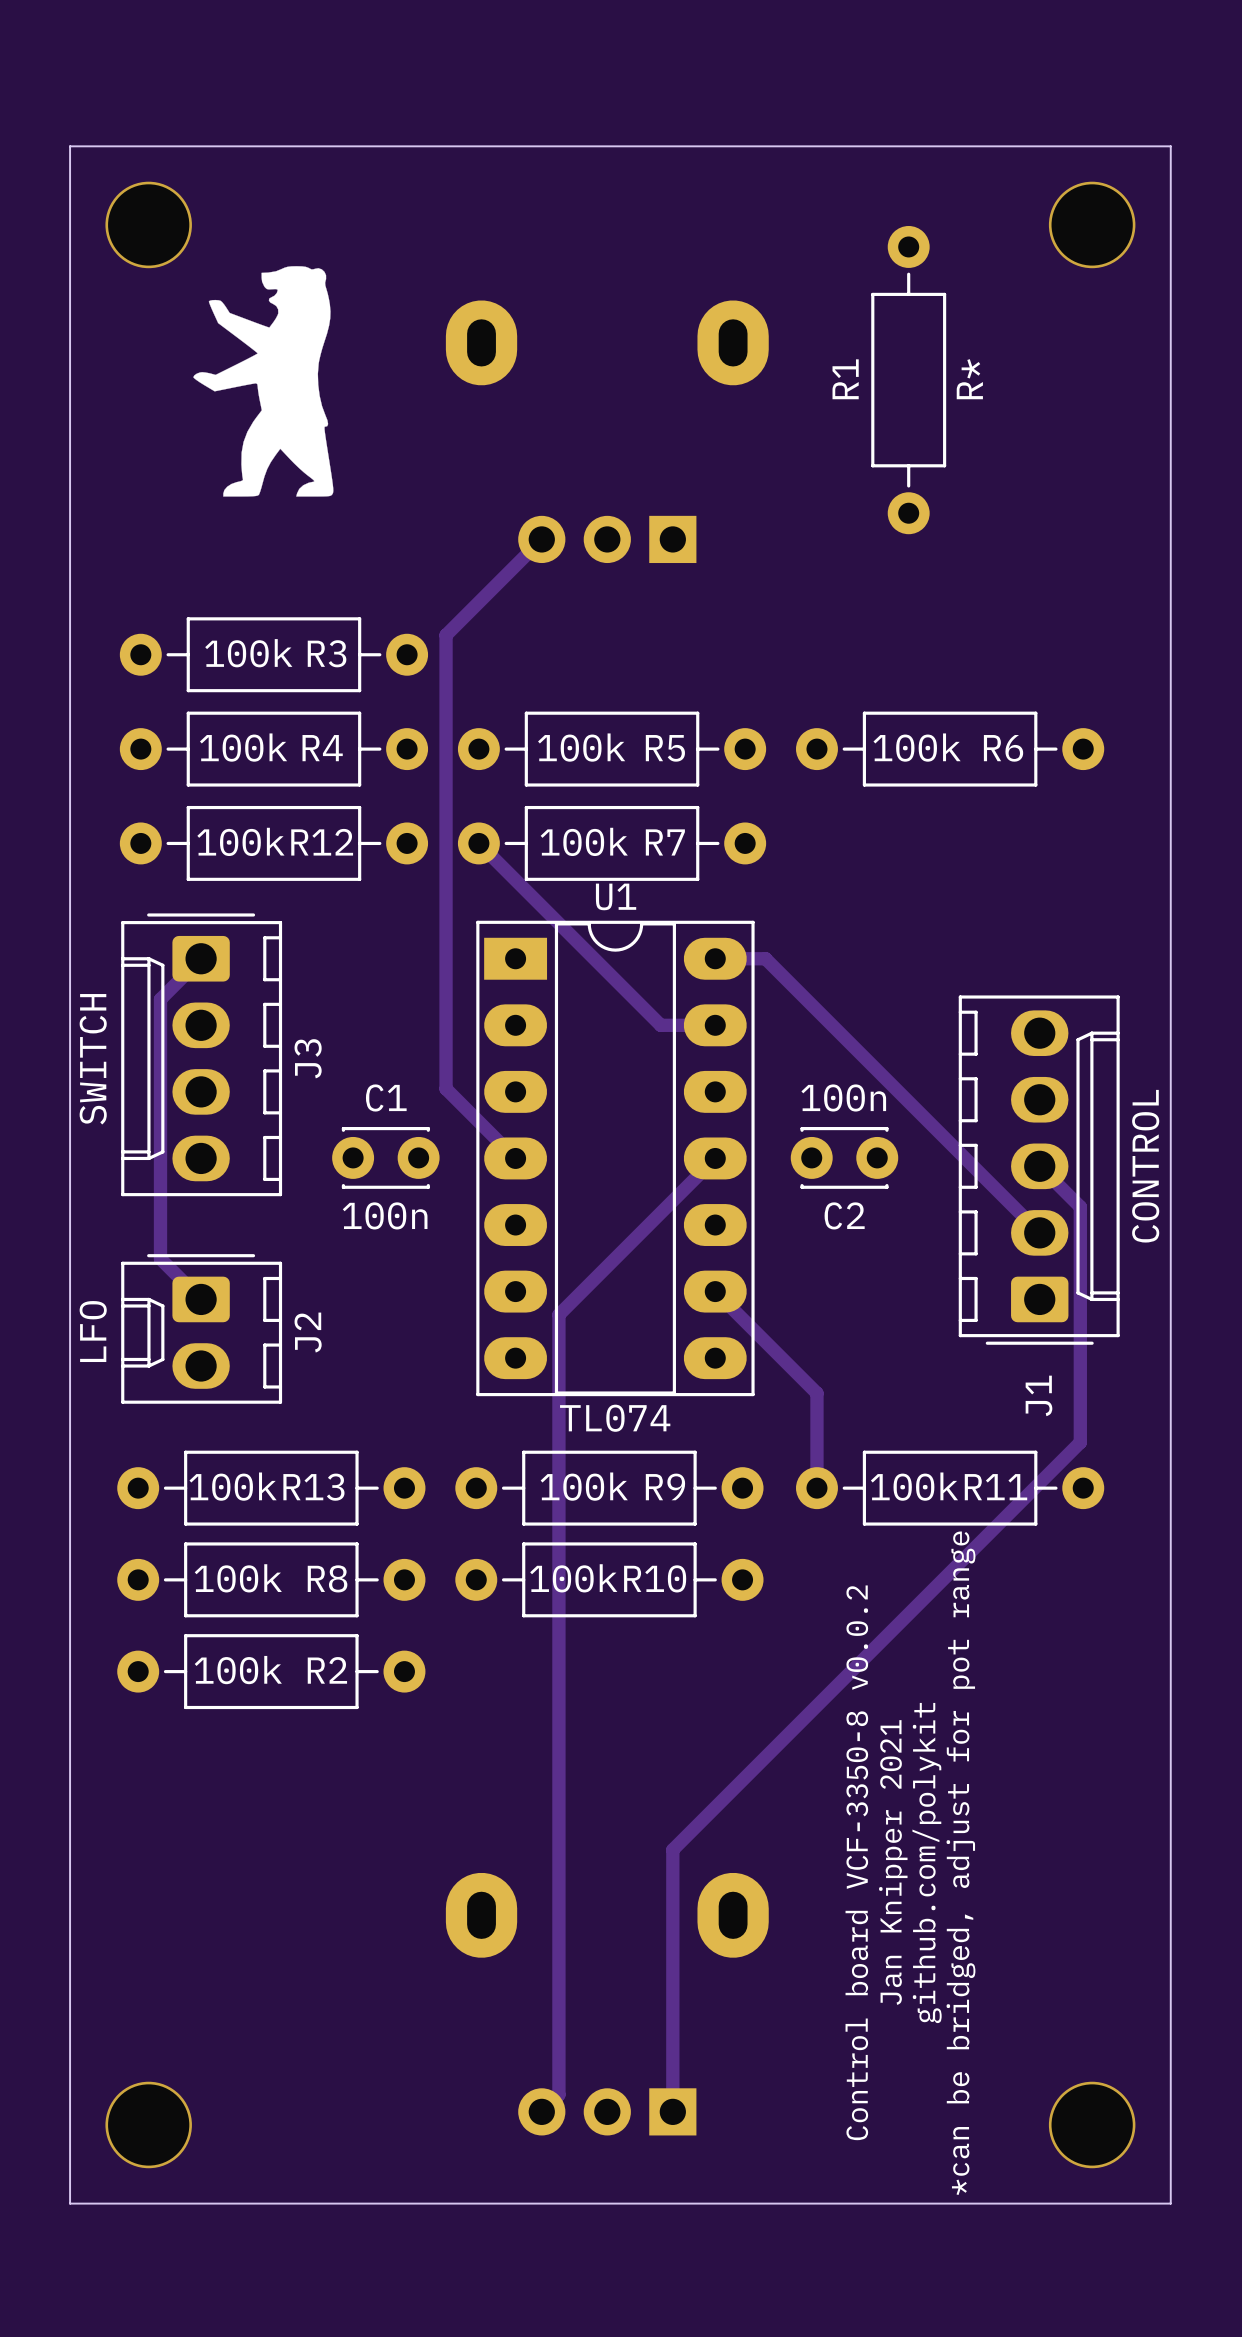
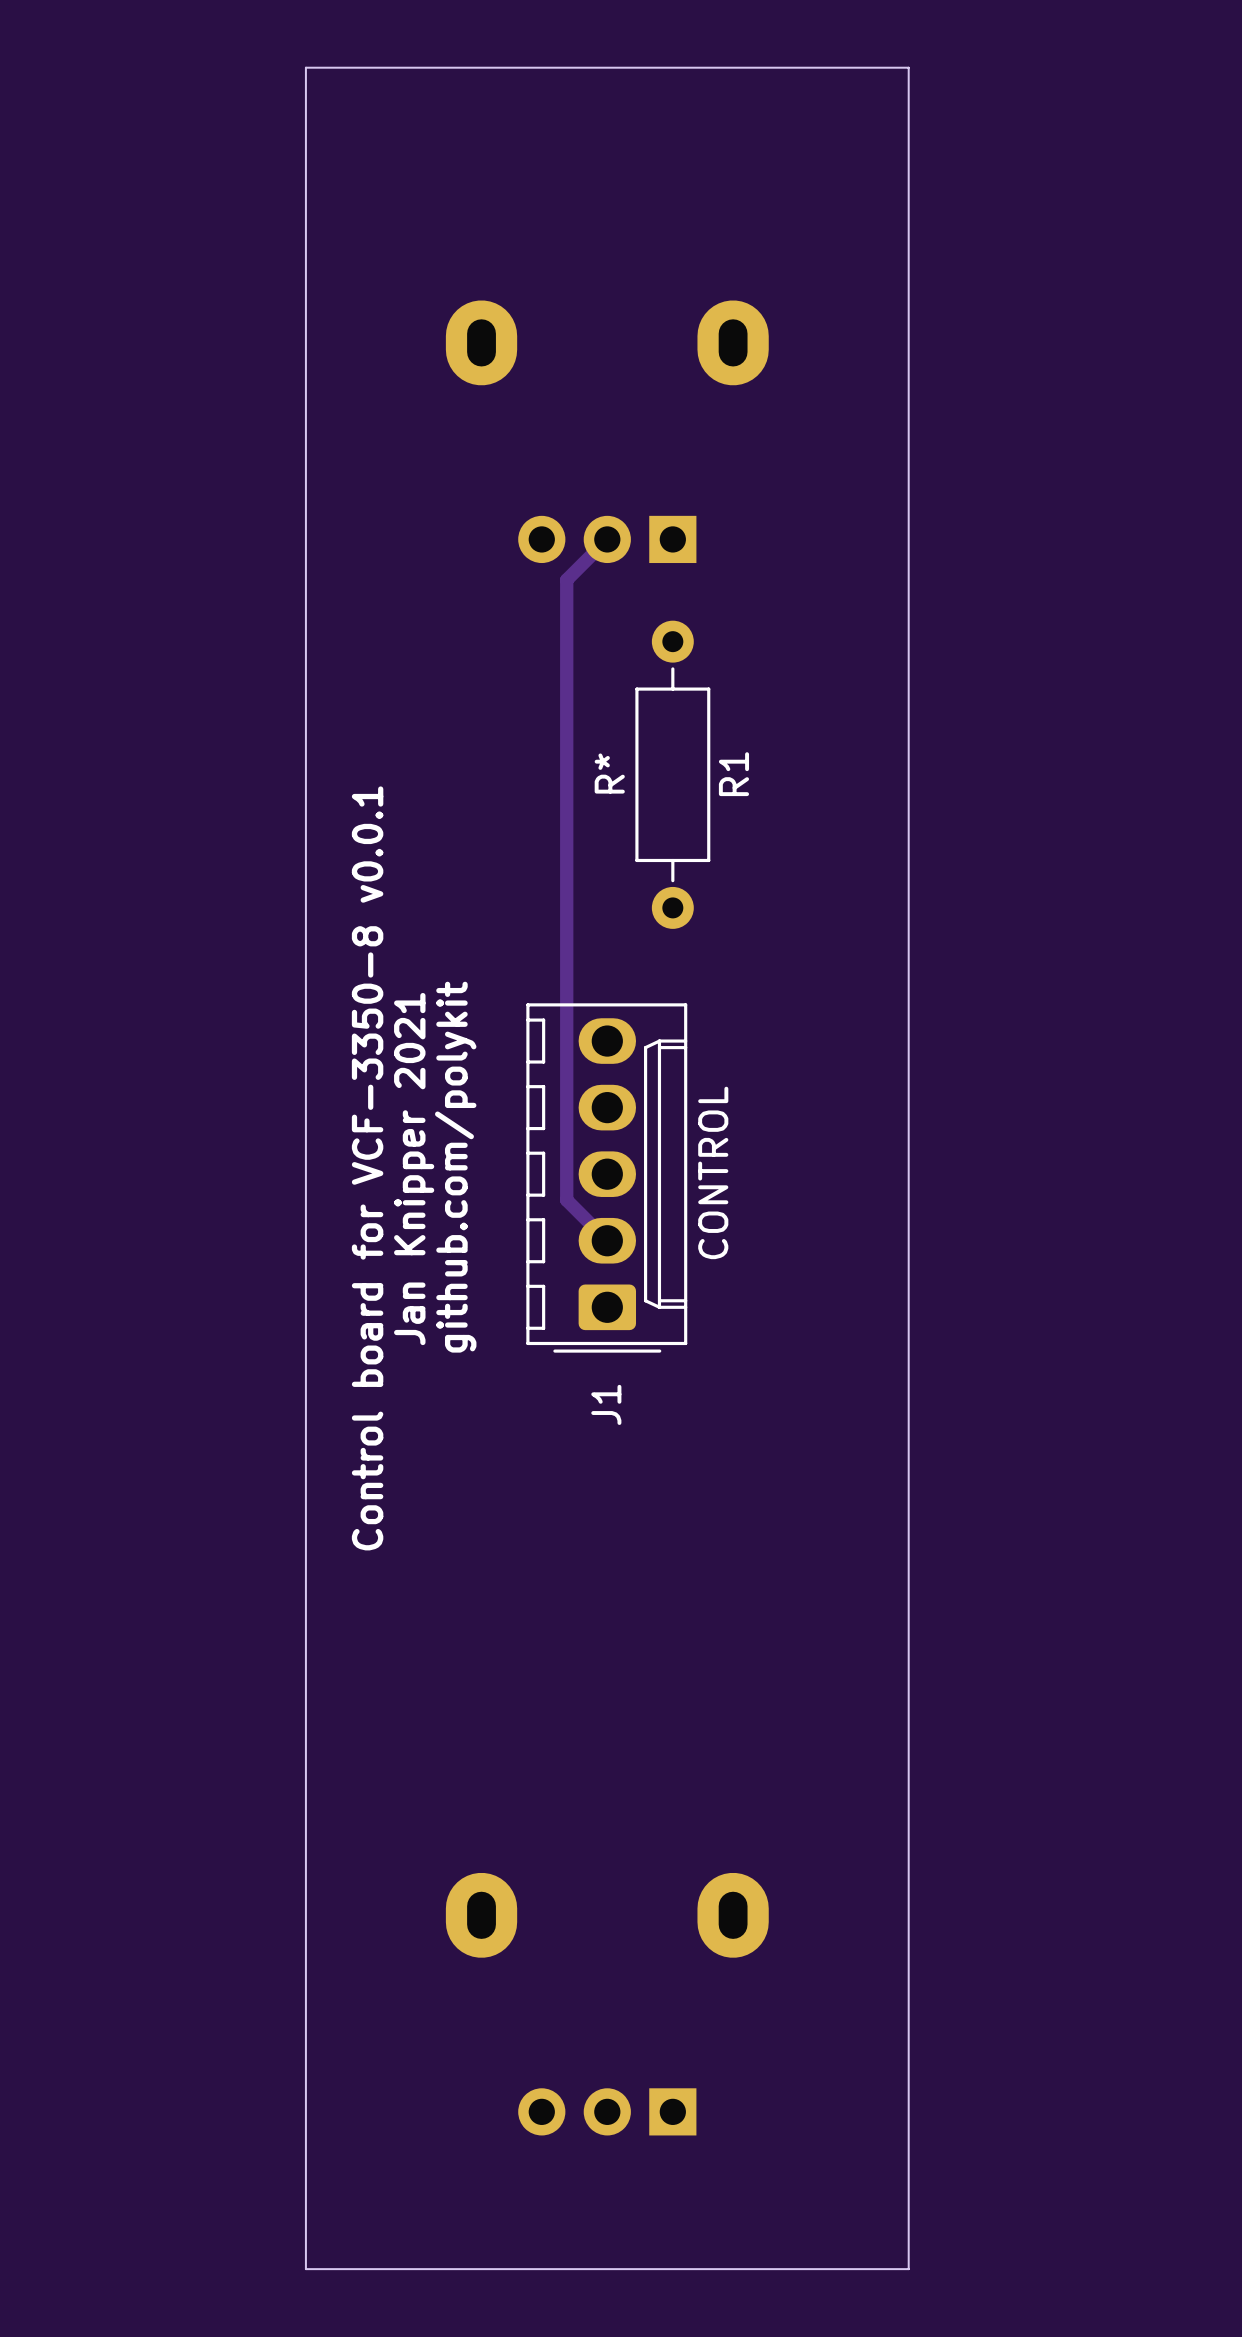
board edge: (70, 146) (1170, 146) (1170, 2203) (70, 2203) (70, 146) -> (305, 67) (305, 2269) (908, 2269) (908, 67) (305, 67)
via: (148, 224) -> none
via: (1092, 224) -> none
drawing: [193, 266, 334, 497] -> none
R1 name position: R1 (845, 379) -> R1 (733, 774)
R1 value position: R* (969, 379) -> R* (609, 773)
R1 position: (908, 380) -> (672, 774)
track: (541, 539) (446, 635) (446, 1088) (515, 1158) -> none
track: none -> (607, 539) (566, 580) (566, 1200) (607, 1240)
R3: 100k (273, 654) -> none
R4: 100k (273, 749) -> none
R5: 100k (612, 749) -> none
R6: 100k (950, 749) -> none
R12: 100k (273, 843) -> none
track: (478, 843) (660, 1025) (715, 1025) -> none
R7: 100k (612, 843) -> none
track: (201, 958) (160, 999) (160, 1258) (201, 1299) -> none
track: (715, 958) (765, 958) (1039, 1232) -> none
J3: SWITCH (201, 1054) -> none
C1: 100n (385, 1157) -> none
C2: 100n (844, 1157) -> none
U1: TL074 (615, 1158) -> none
track: (715, 1158) (558, 1314) (558, 2094) (541, 2111) -> none
track: (1039, 1166) (1080, 1206) (1080, 1442) (672, 1849) (672, 2111) -> none
text: none -> Control board for VCF-3350-8 v0.0.1 (367, 1168)
text: none -> Jan Knipper 2021 (414, 1169)
text: none -> github.com/polykit (455, 1167)
J1 position: (1039, 1170) -> (606, 1177)
track: (715, 1291) (816, 1393) (816, 1488) -> none
J2: LFO (201, 1328) -> none
R13: 100k (271, 1488) -> none
R9: 100k (609, 1488) -> none
R11: 100k (950, 1488) -> none
R8: 100k (271, 1579) -> none
R10: 100k (609, 1579) -> none
R2: 100k (271, 1671) -> none
text: Control board VCF-3350-8 v0.0.2 (856, 1862) -> none
text: Jan Knipper 2021 (893, 1862) -> none
text: github.com/polykit (927, 1863) -> none
text: *can be bridged, adjust for pot range (960, 1863) -> none
via: (148, 2124) -> none
via: (1092, 2124) -> none

